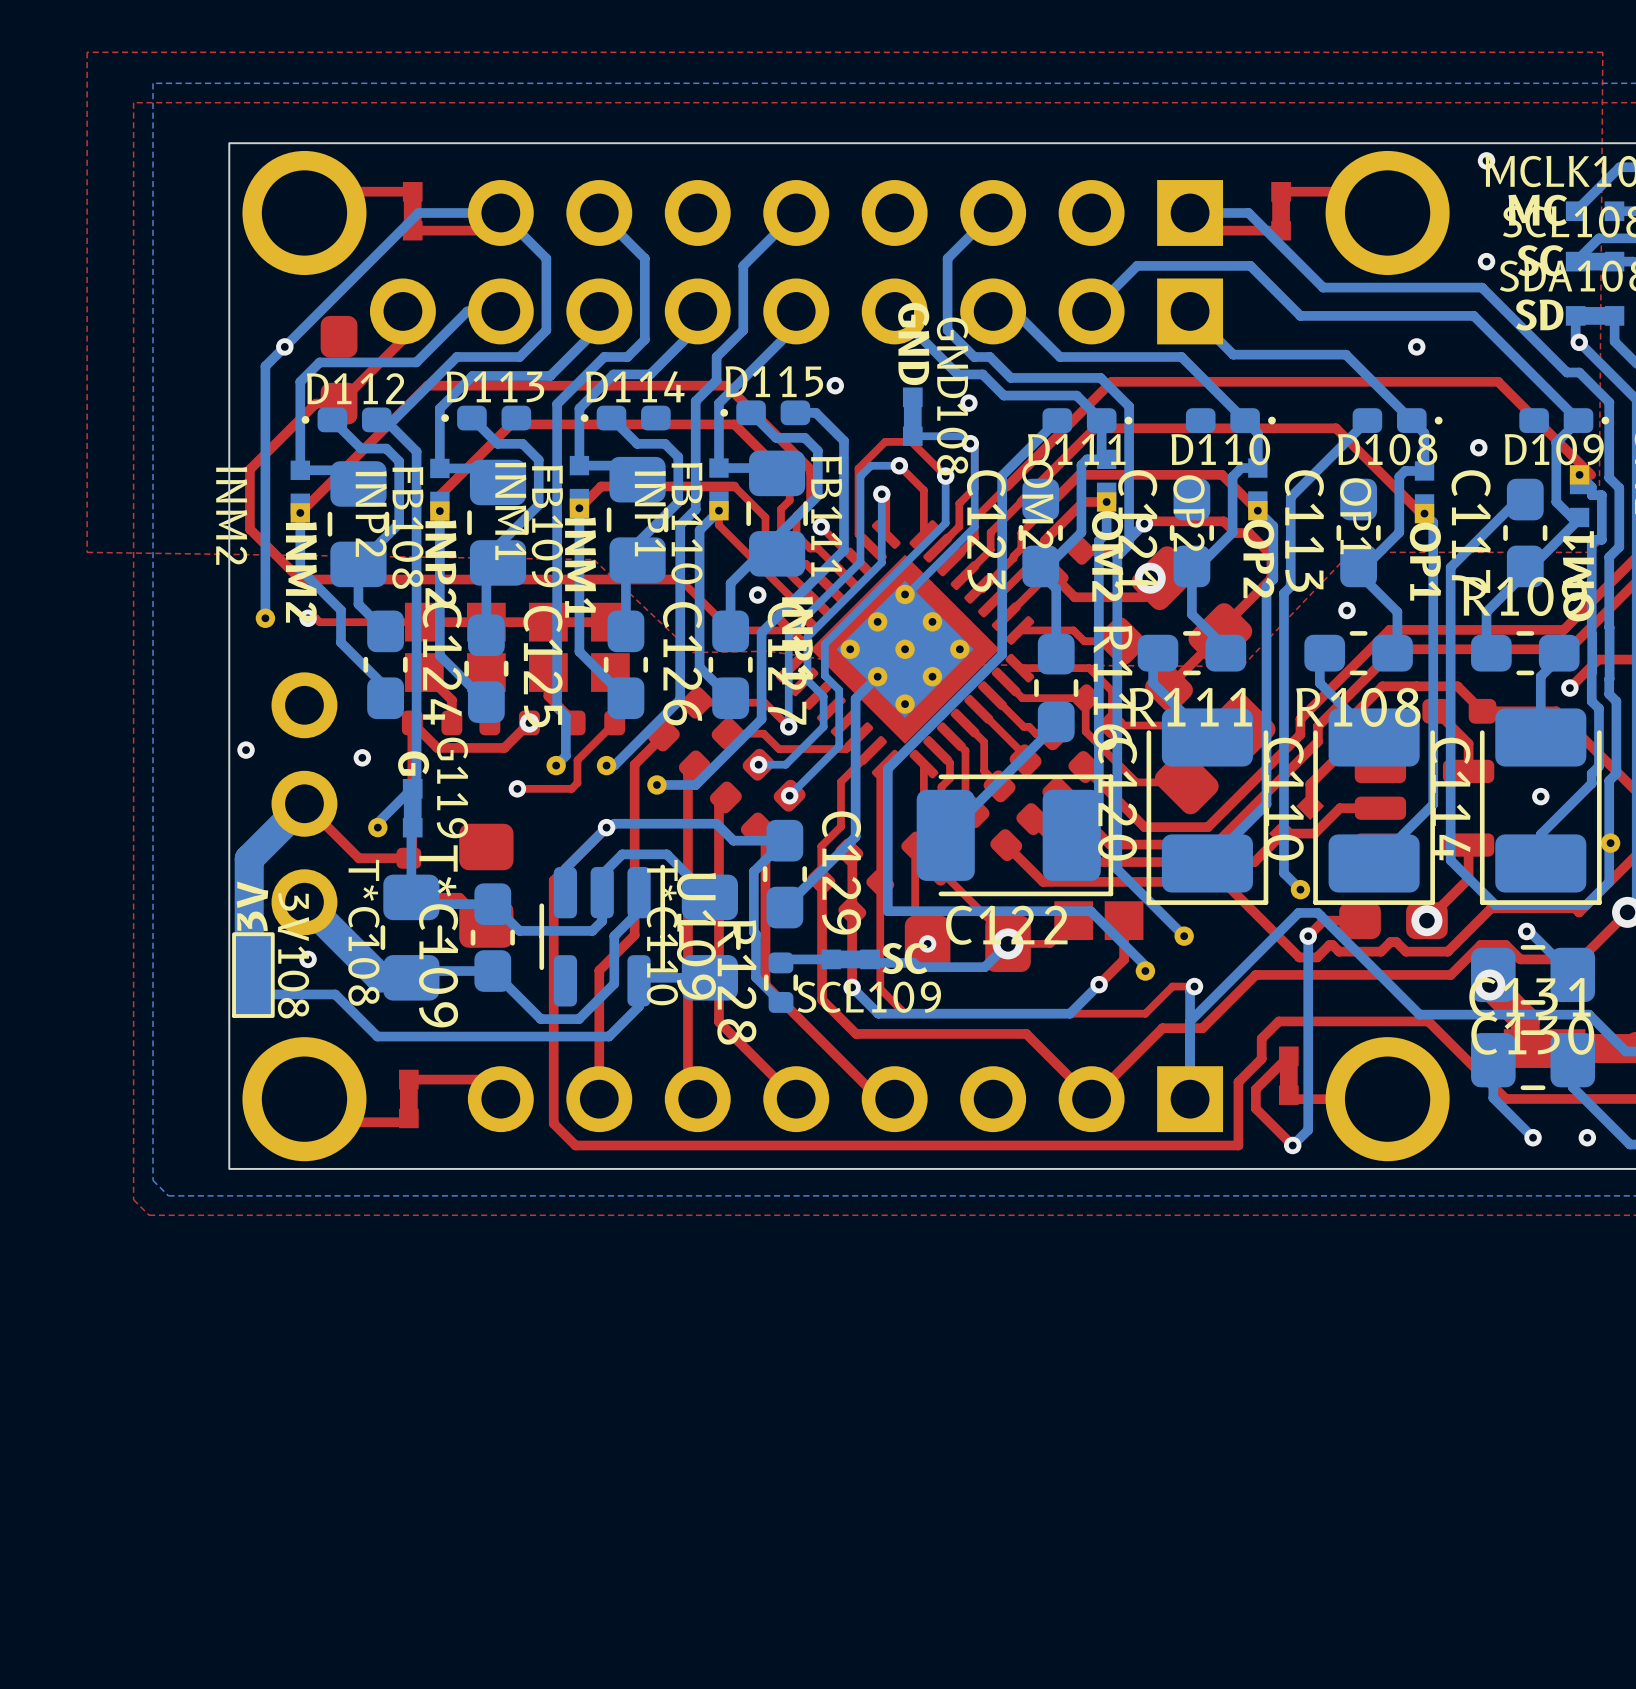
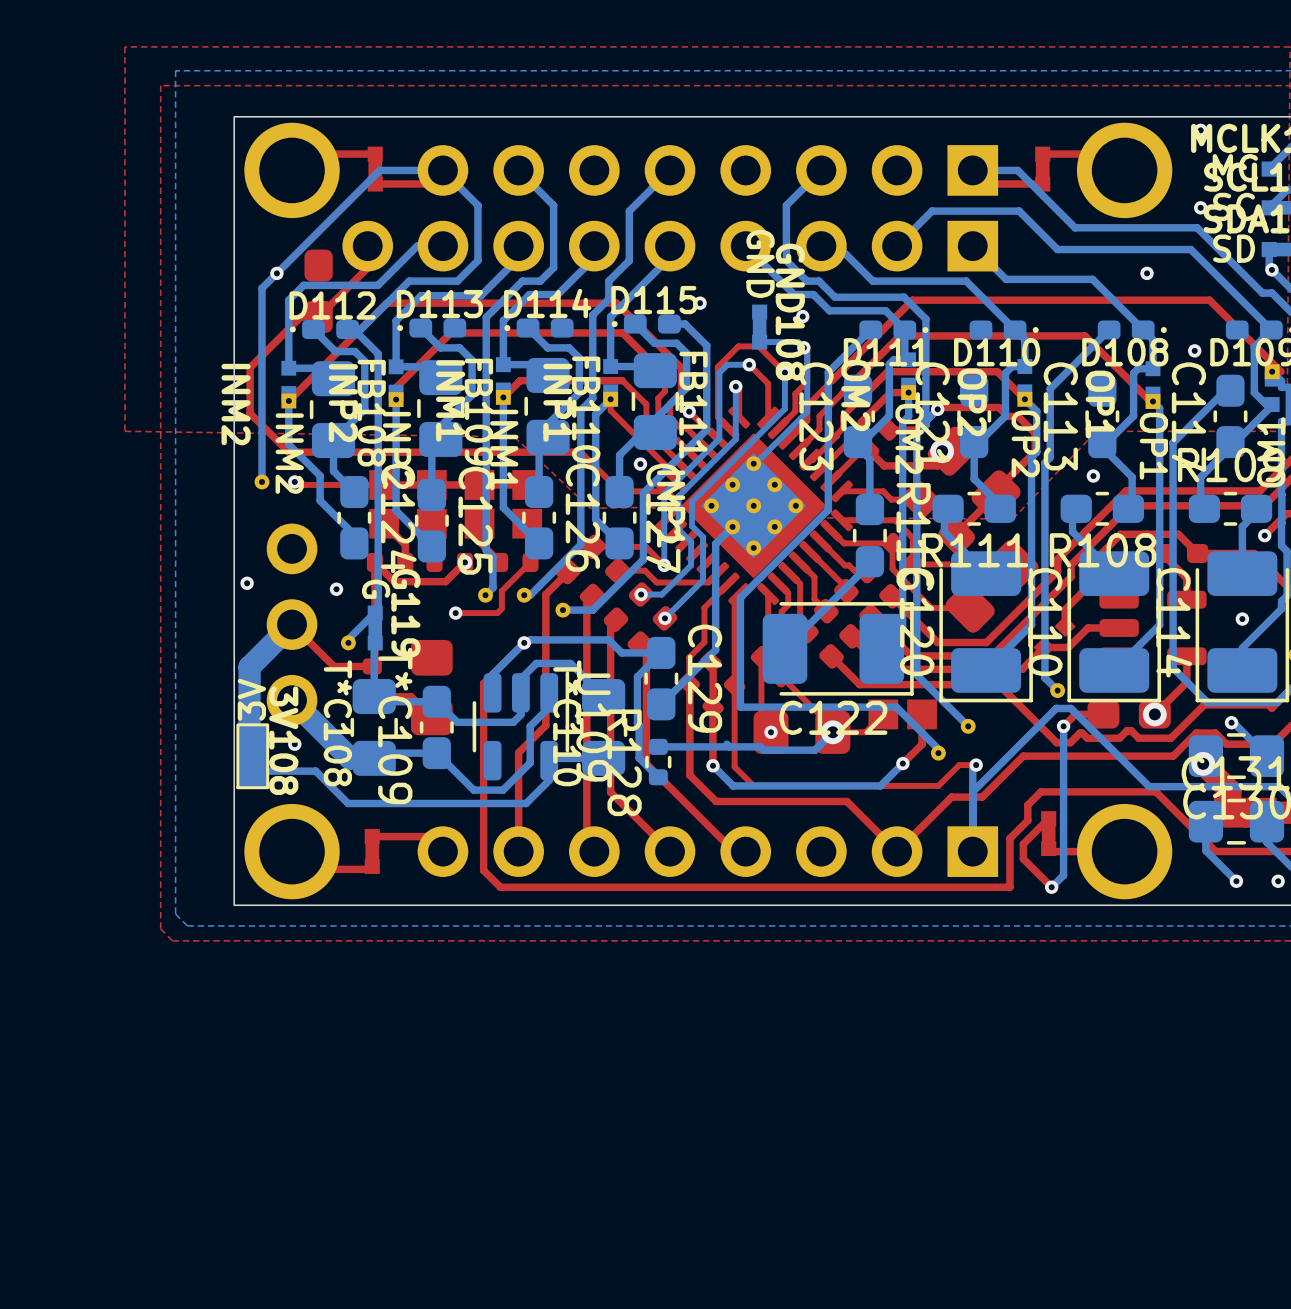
bottom track: (831, 959) (784, 959) (781, 962) -> (729, 746) (658, 746)
SCL109: (850, 959) -> none

